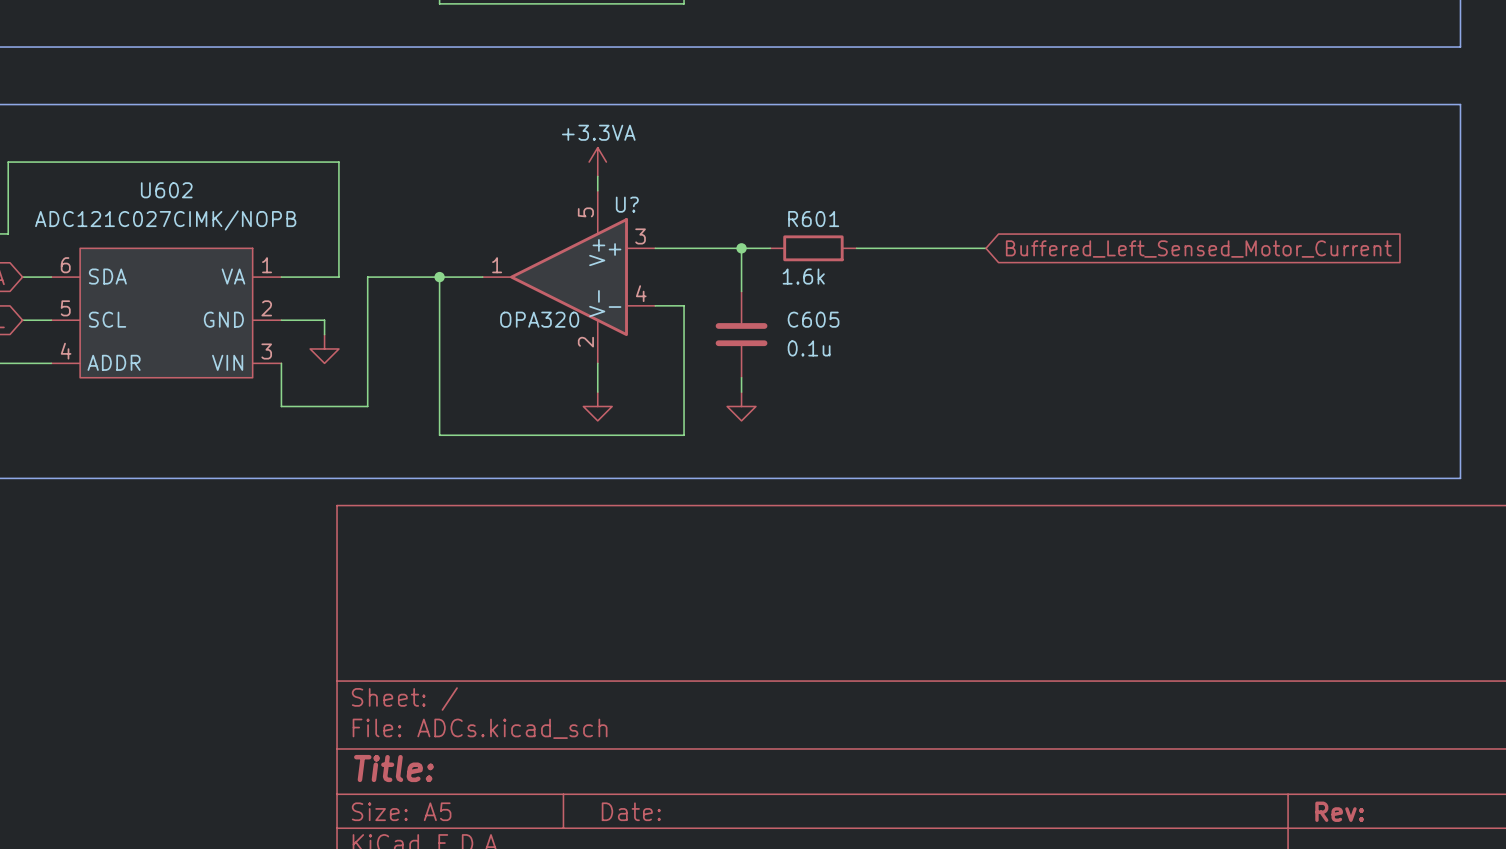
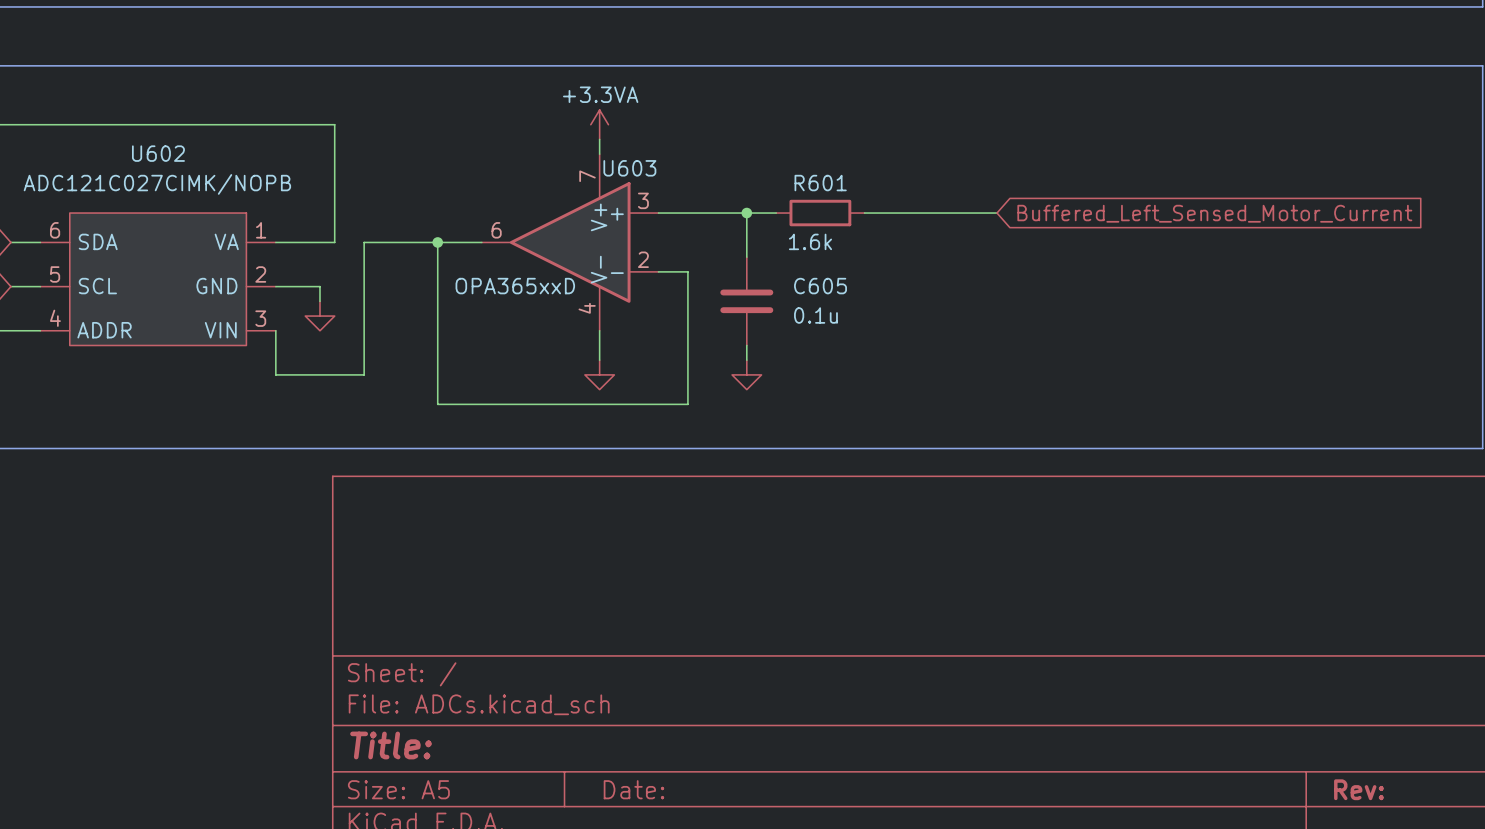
U? name: U? (627, 204) -> U603 (629, 168)
U? pin number: 5 (585, 212) -> 7 (587, 176)
U? pin number: 1 (497, 265) -> 6 (496, 230)
U? pin number: 4 (641, 293) -> 2 (643, 259)
U? value: OPA320 (539, 319) -> OPA365xxD (515, 286)
U? pin number: 2 (585, 342) -> 4 (587, 308)

